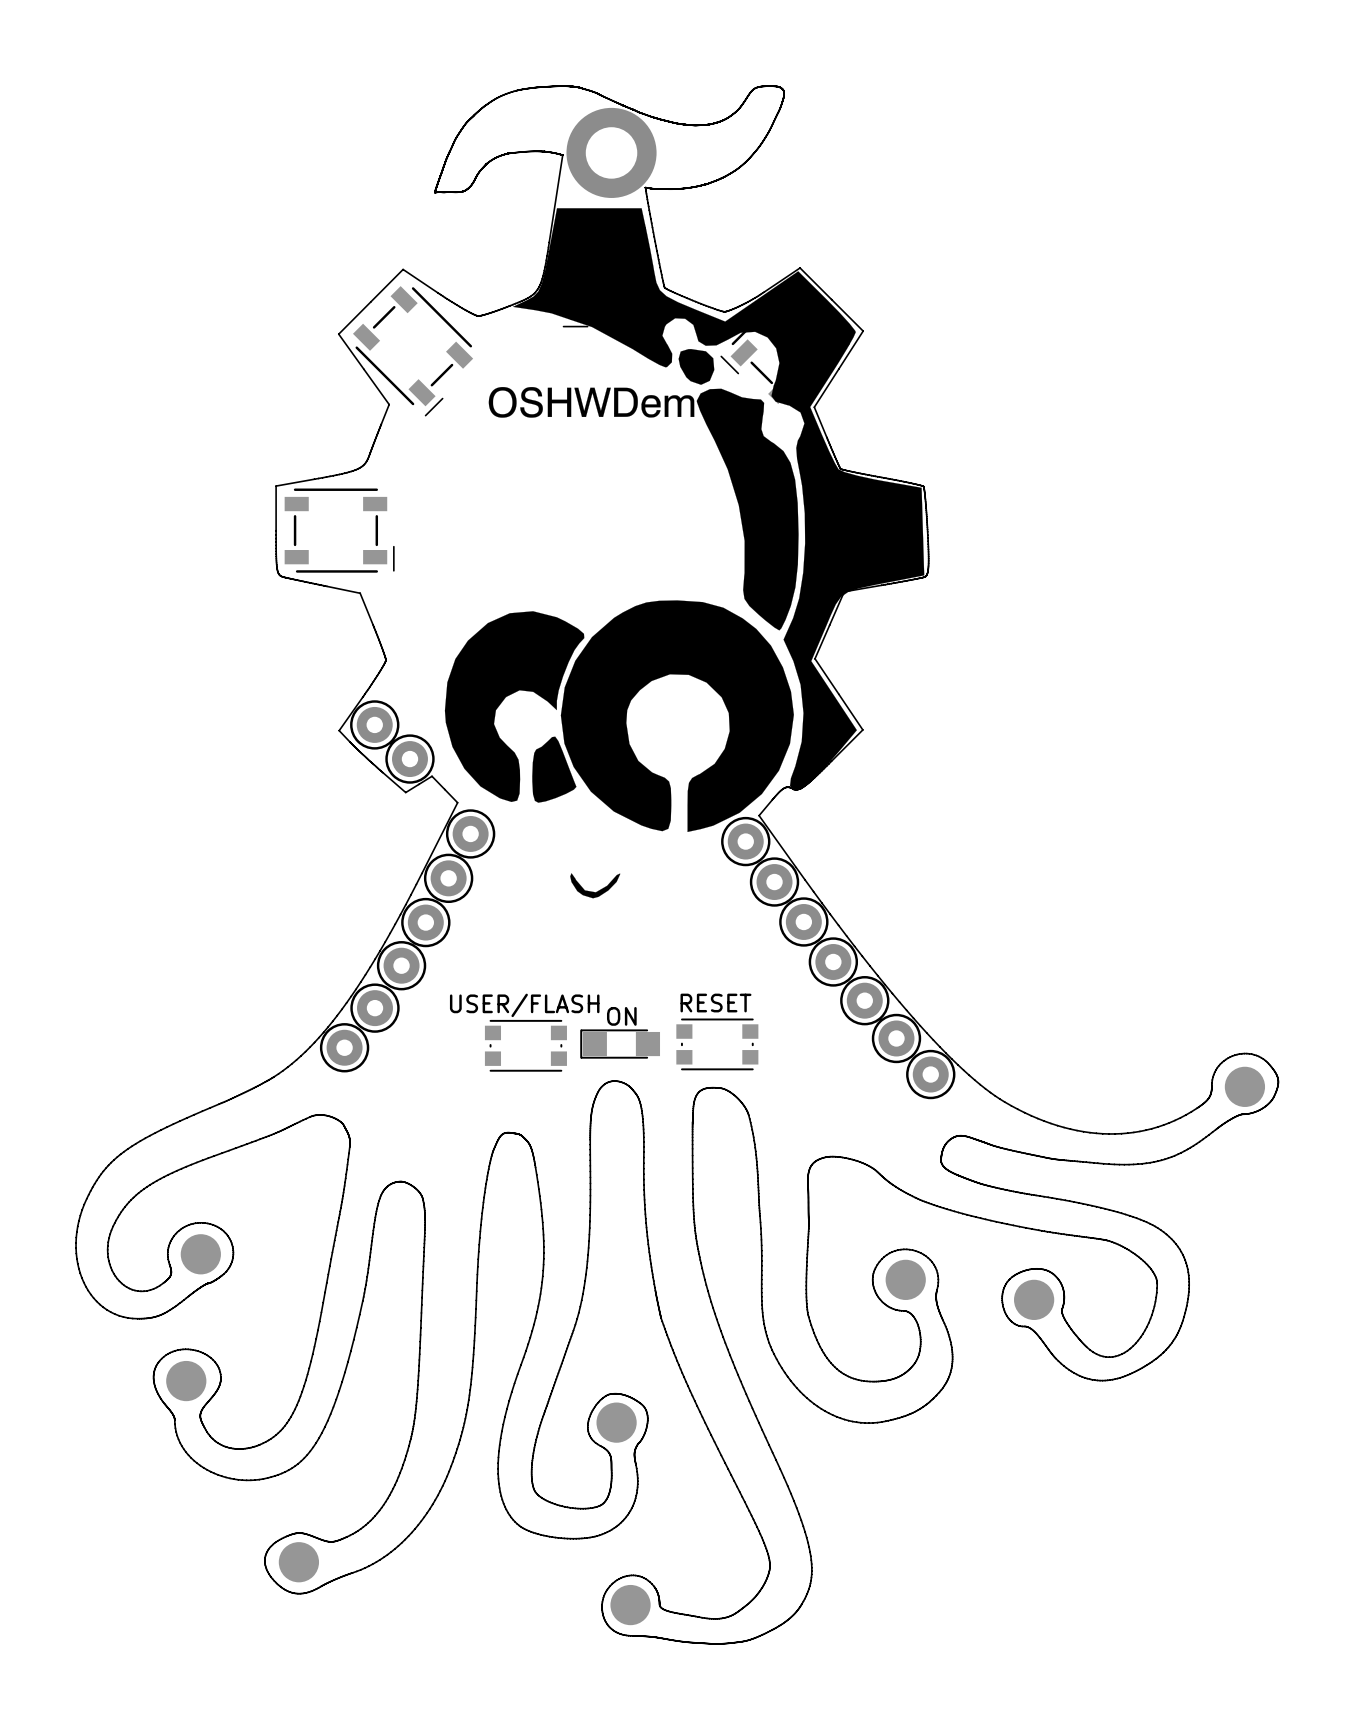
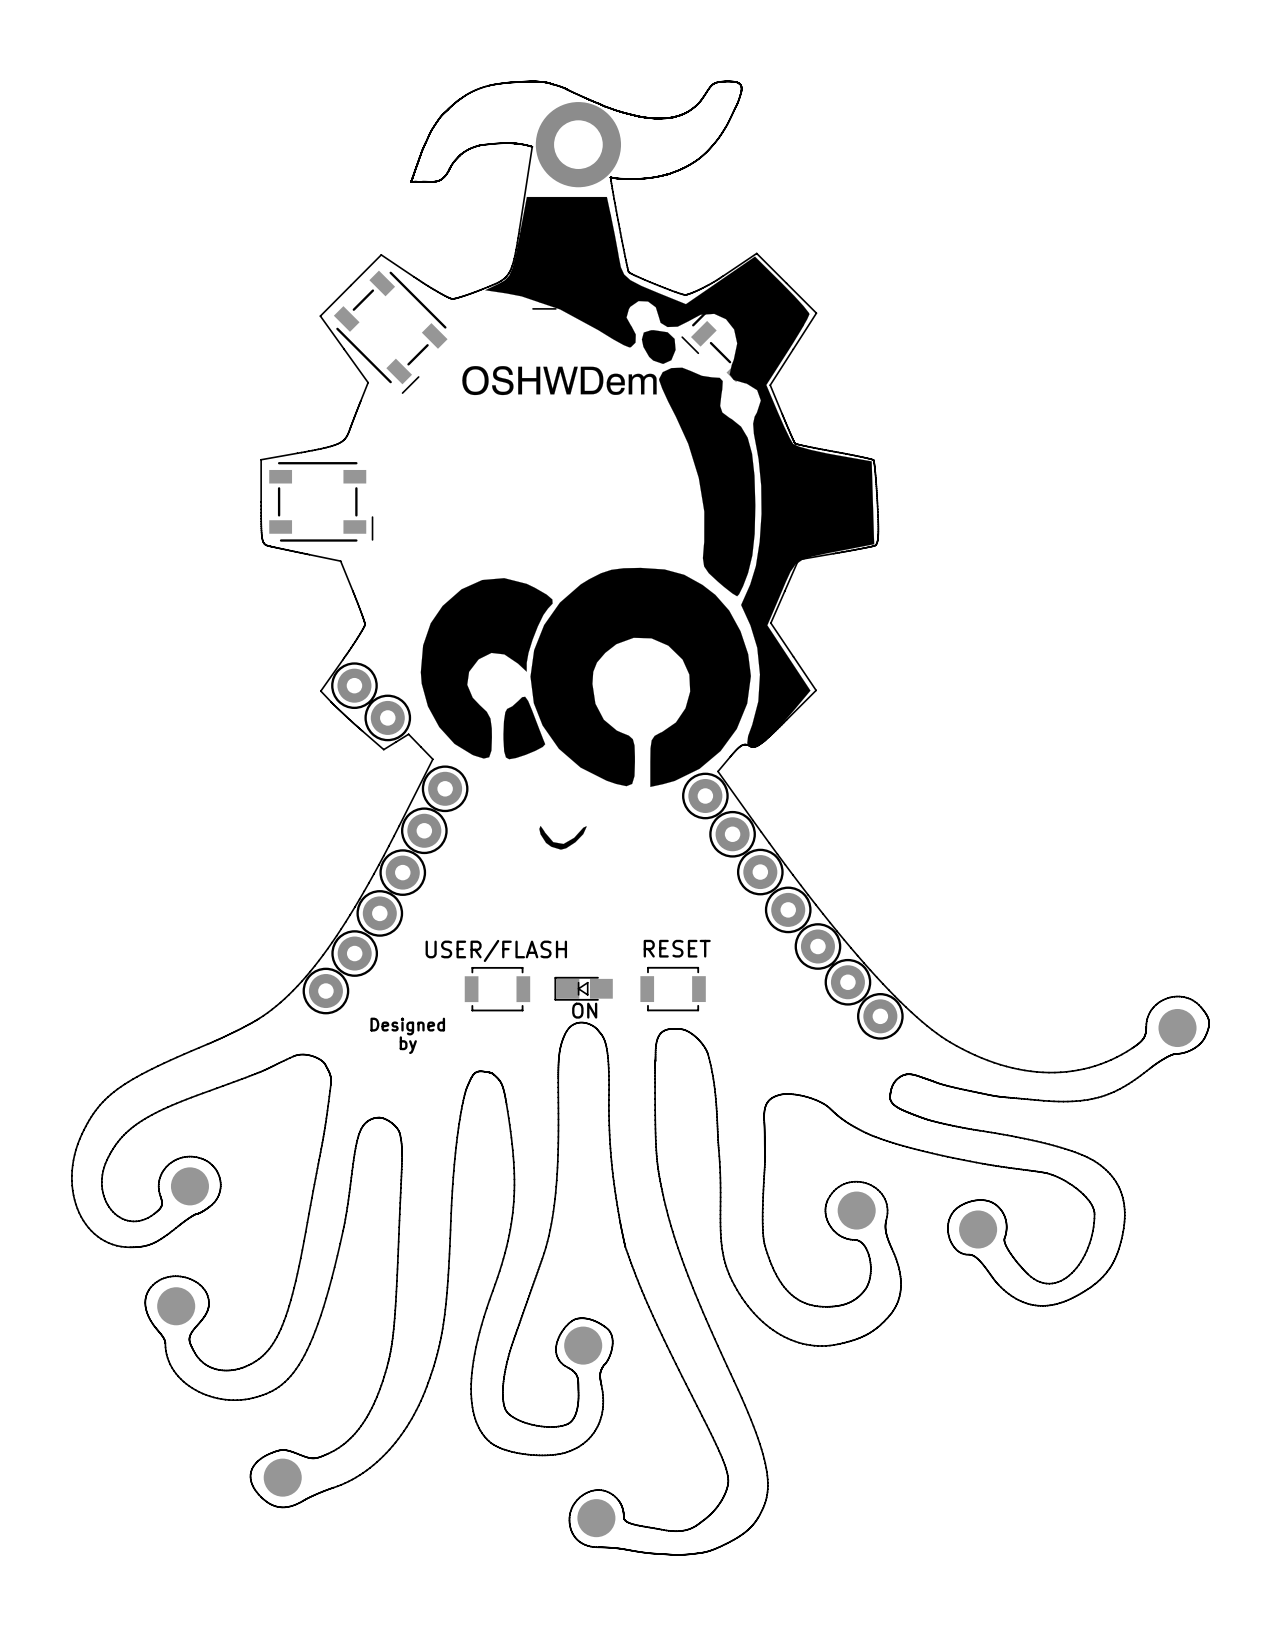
text position: ON (621, 1016) -> ON (584, 1010)
part footprint: [676, 1018, 759, 1071] -> [640, 966, 706, 1012]
part footprint: [484, 1019, 567, 1072] -> [464, 966, 531, 1012]
part footprint: [580, 1029, 661, 1059] -> [554, 976, 613, 1001]
text: none -> Designed (407, 1026)
text: none -> by (408, 1045)

